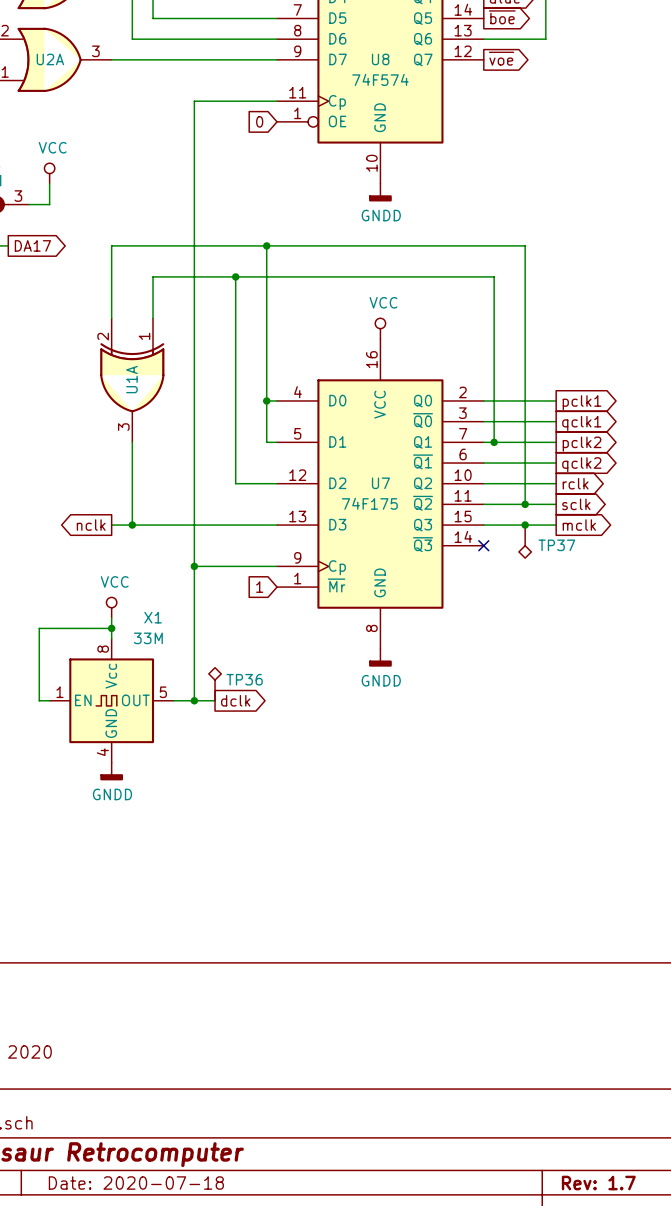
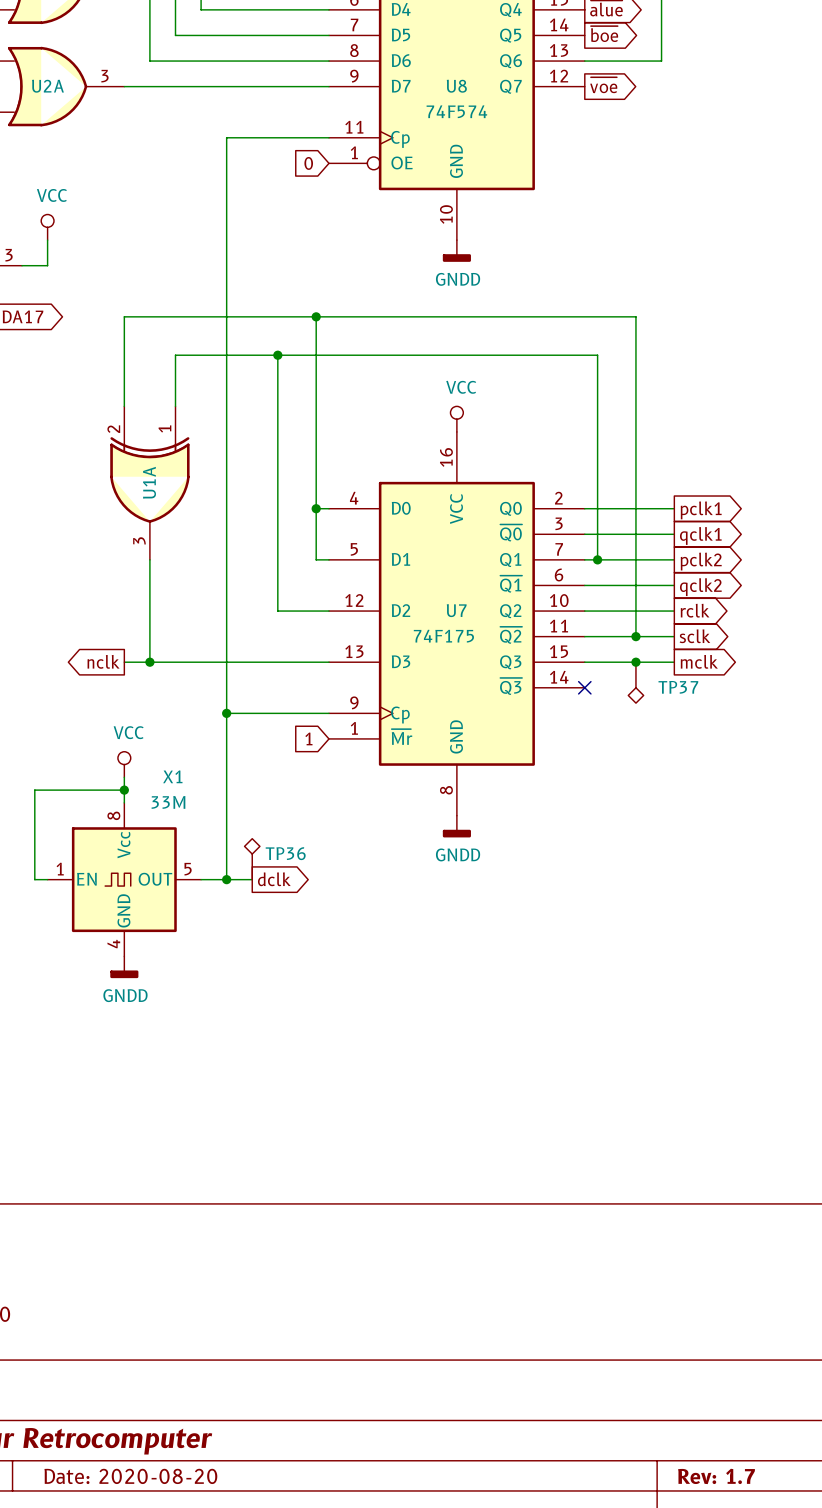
title block: Date: 2020-07-18 (136, 1183) -> Date: 2020-08-20 (130, 1476)

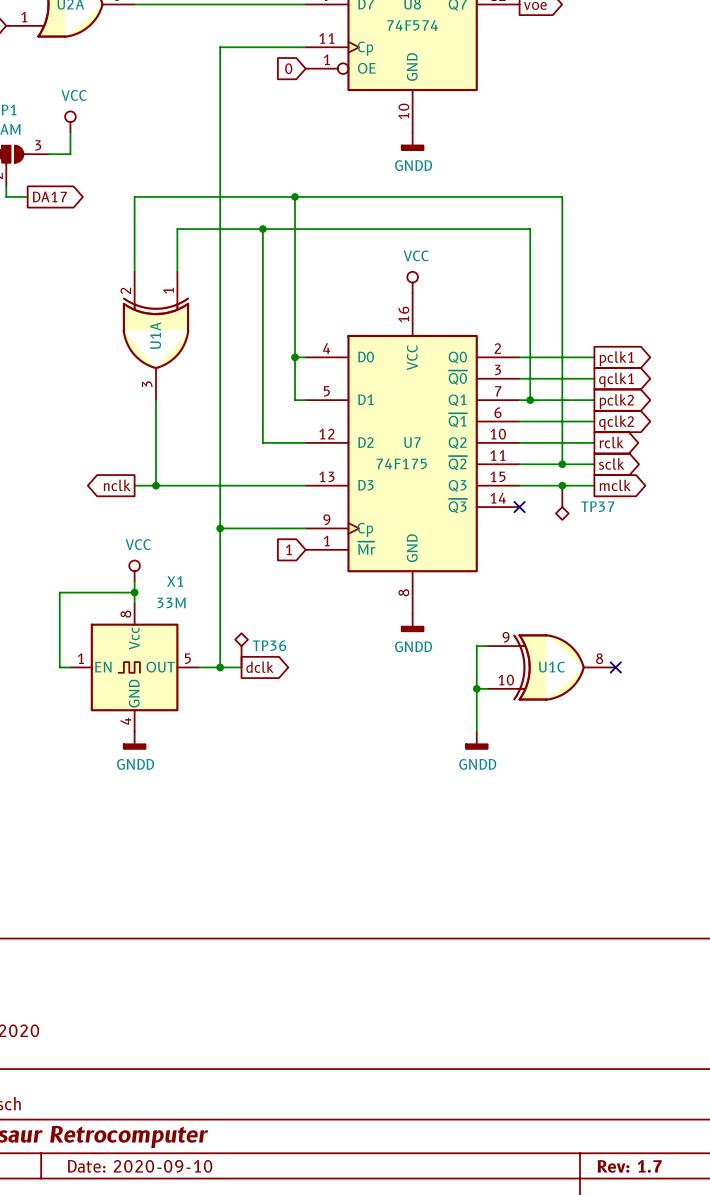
wire: none -> (487, 646) (476, 646) (476, 731)
U1C: none -> (551, 667)
no-connect mark: none -> (615, 667)
wire: none -> (476, 688) (487, 688)
junction: none -> (476, 688)
power symbol: none -> GNDD (476, 740)
title block: Date: 2020-08-20 (130, 1476) -> Date: 2020-09-10 (140, 1166)

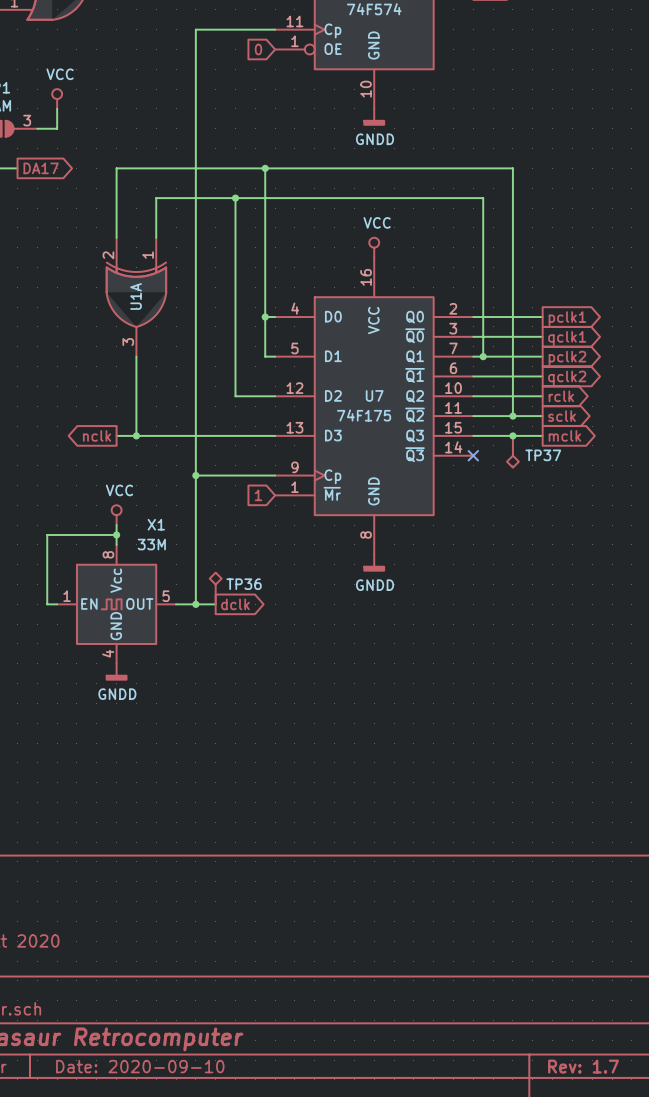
wire: (487, 646) (476, 646) (476, 731) -> none
U1C: (551, 667) -> none
no-connect mark: (615, 667) -> none
wire: (476, 688) (487, 688) -> none
junction: (476, 688) -> none
power symbol: GNDD (476, 740) -> none

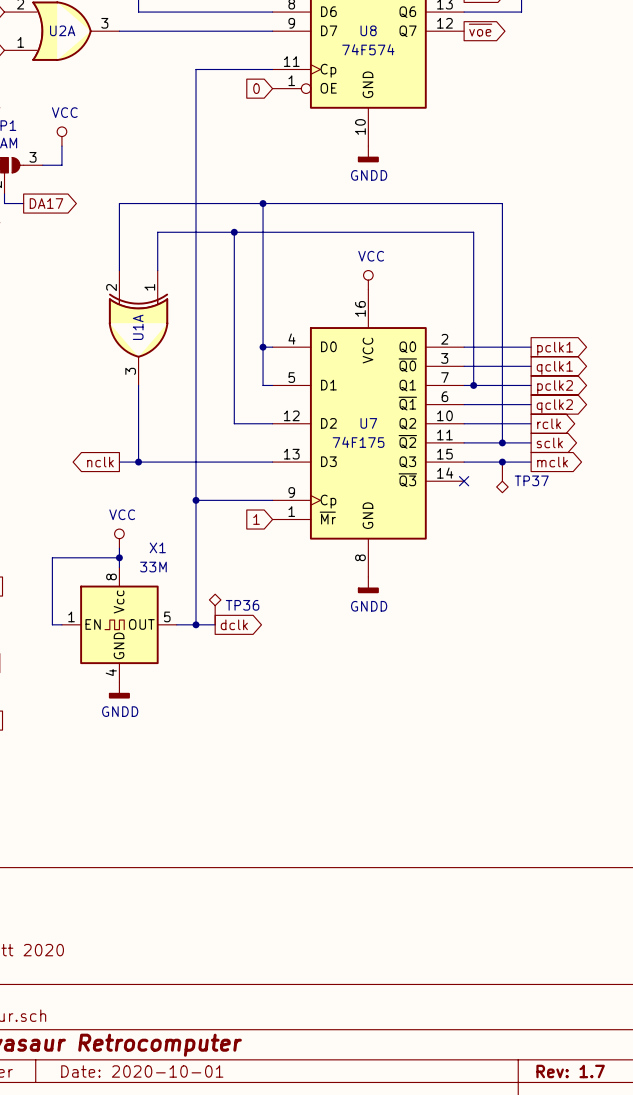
title block: Date: 2020-09-10 (140, 1066) -> Date: 2020-10-01 (142, 1071)

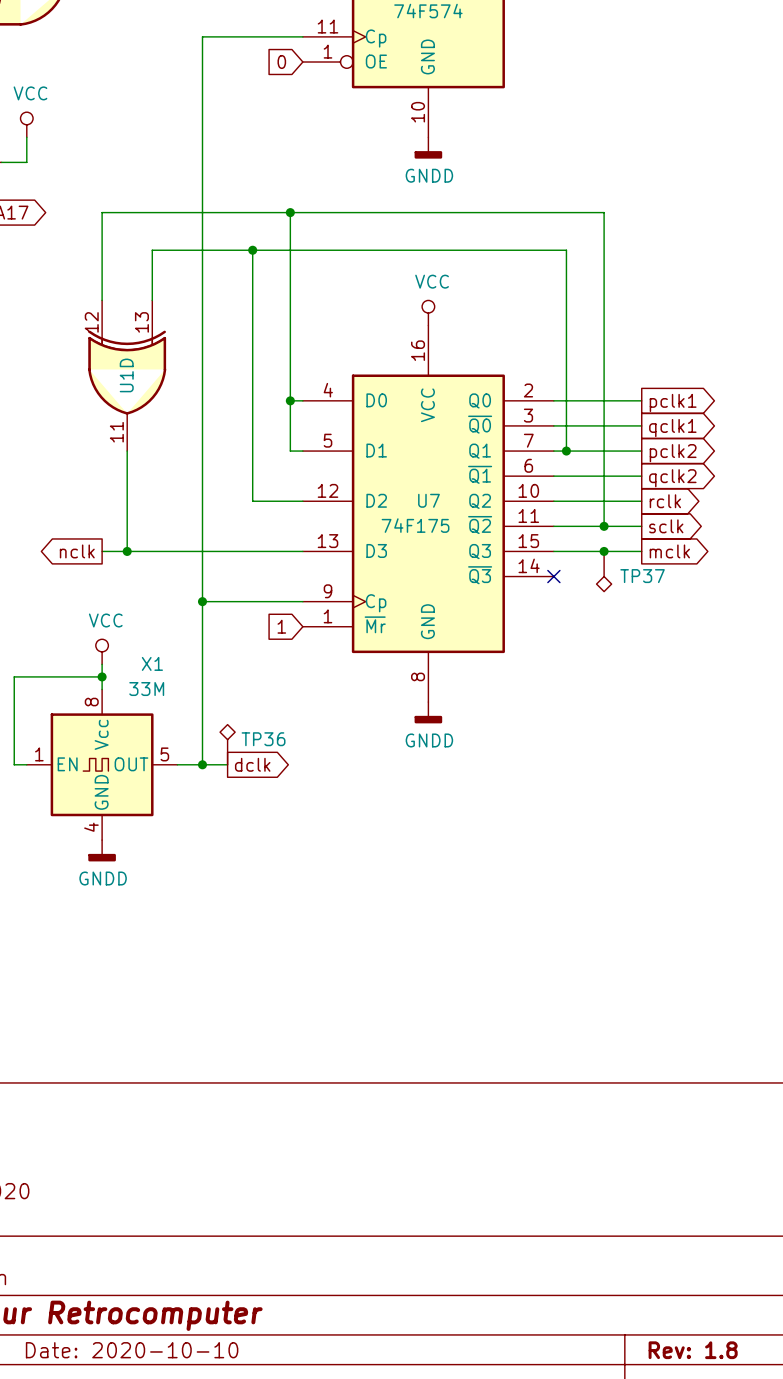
U1A: (138, 328) -> none
U1D: none -> (127, 375)
title block: Date: 2020-10-01 (142, 1071) -> Date: 2020-10-10 (132, 1350)
title block: Rev: 1.7 (570, 1071) -> Rev: 1.8 (693, 1350)

